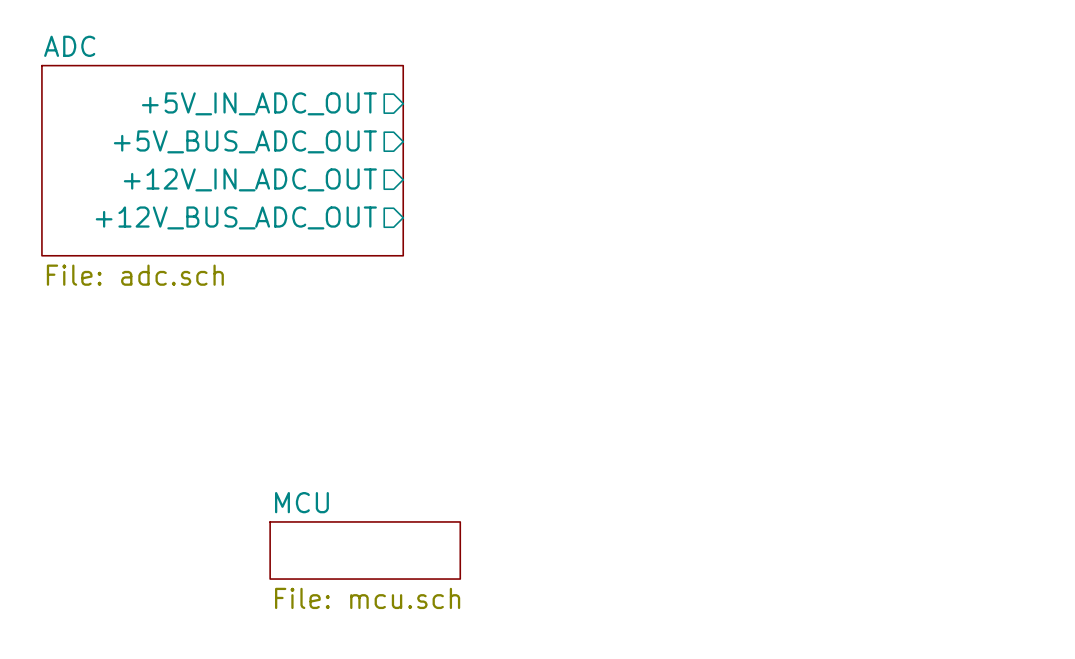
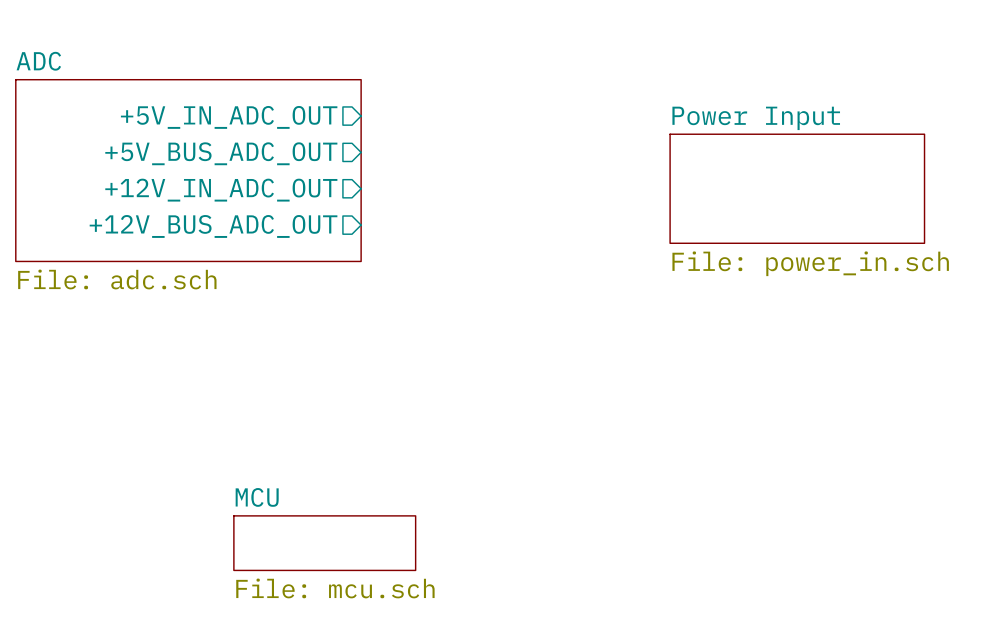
sheet Power Input: none -> File: power_in.sch (797, 188)

